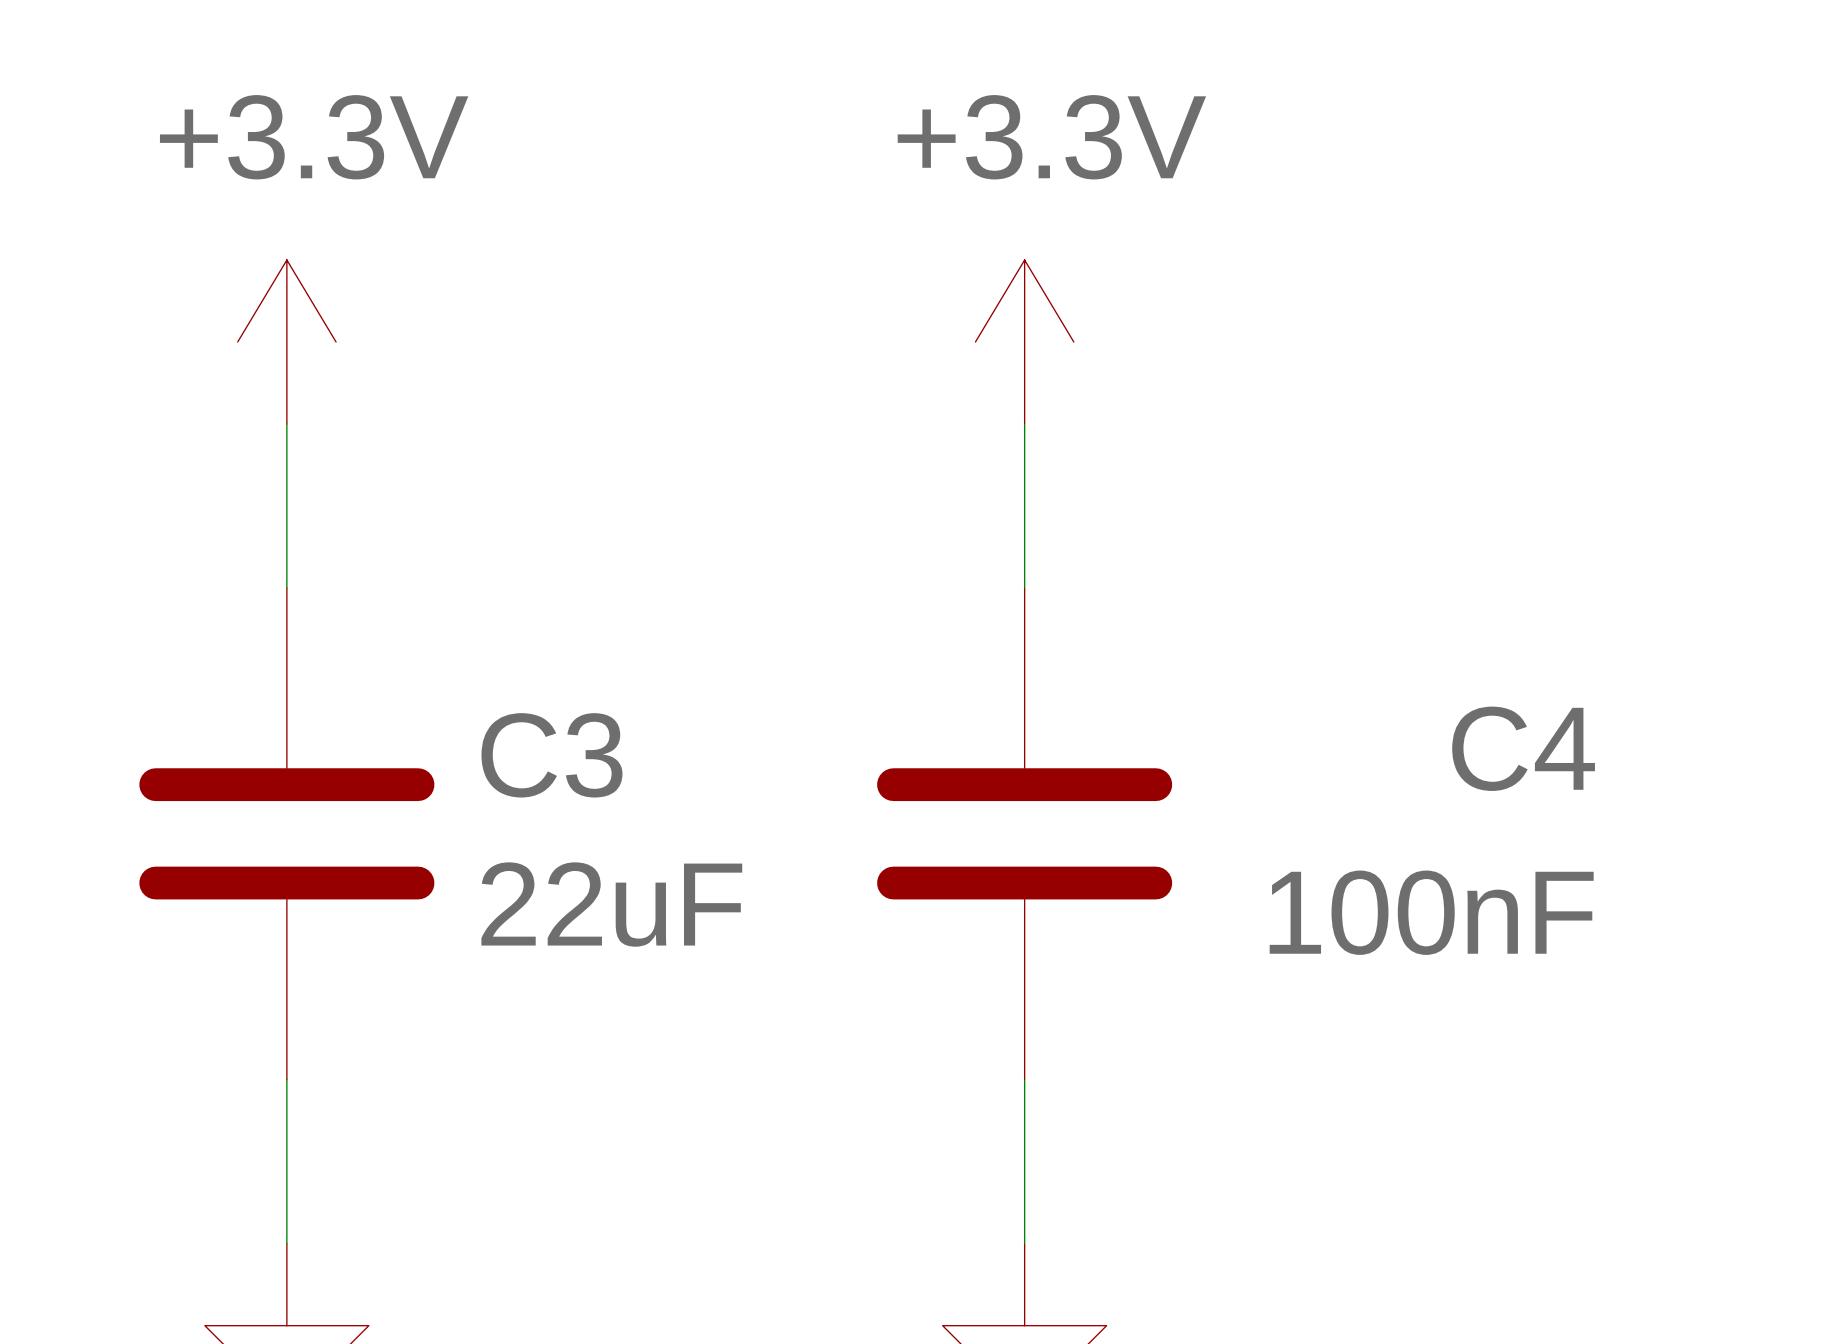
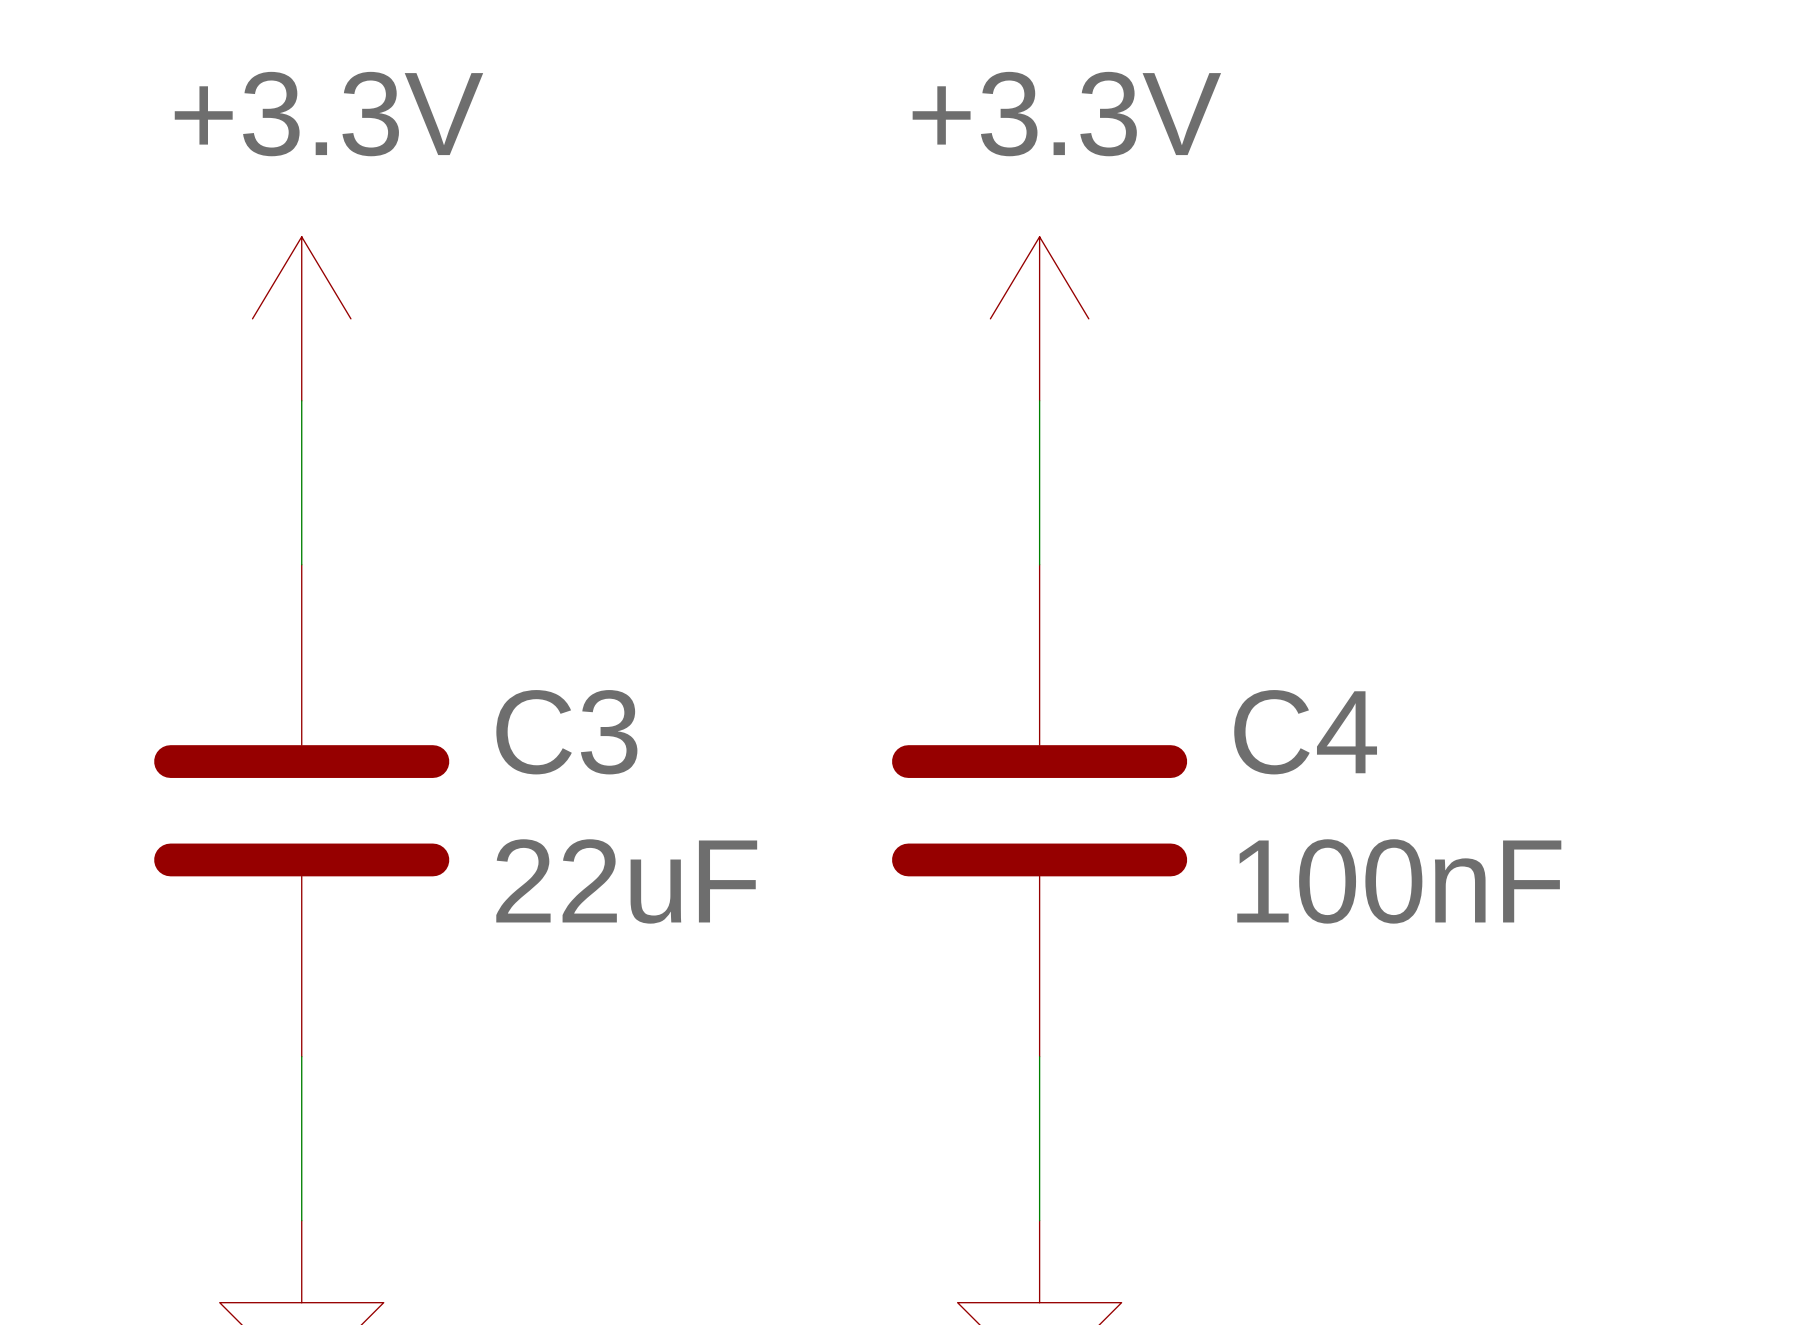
C4 name position: C4 (1523, 748) -> C4 (1305, 732)
C4 value position: 100nF (1431, 912) -> 100nF (1399, 881)

